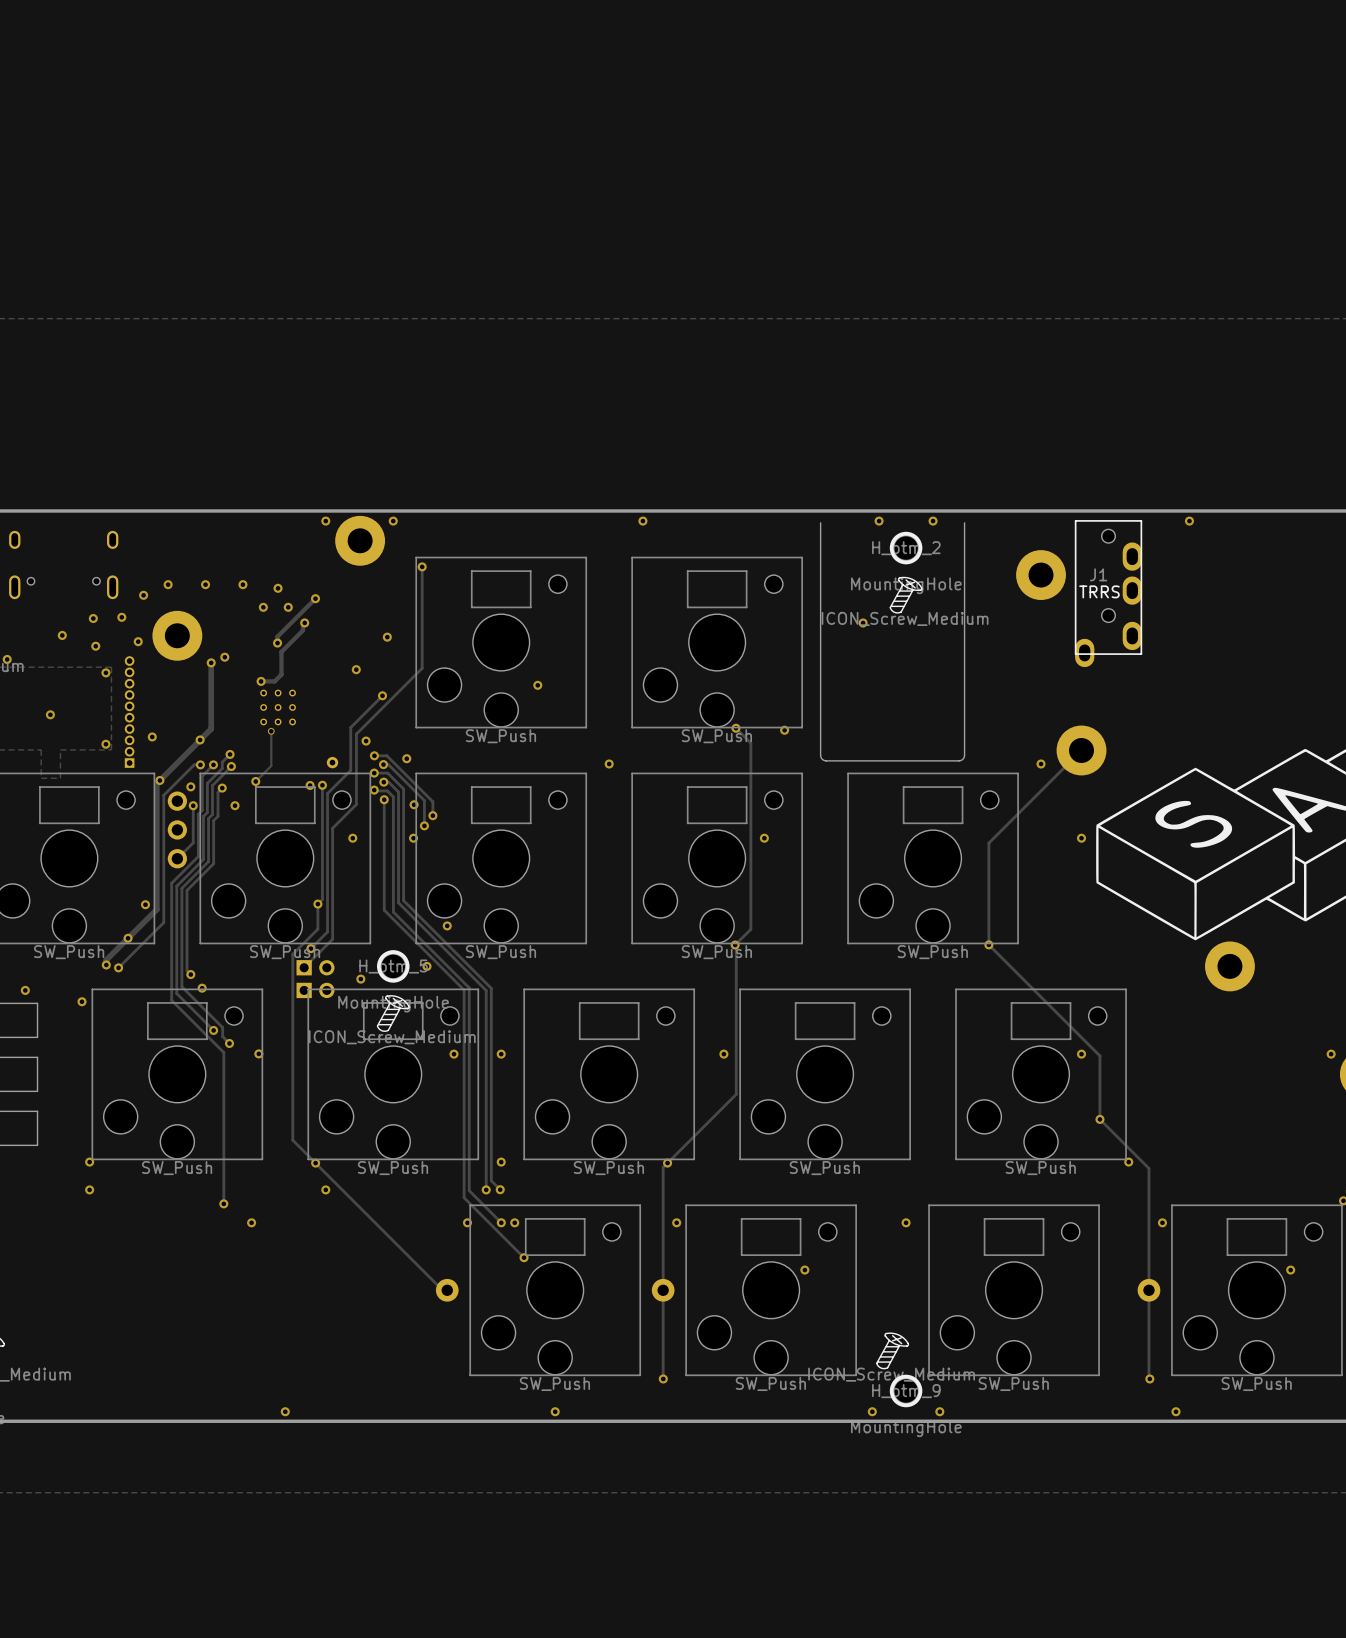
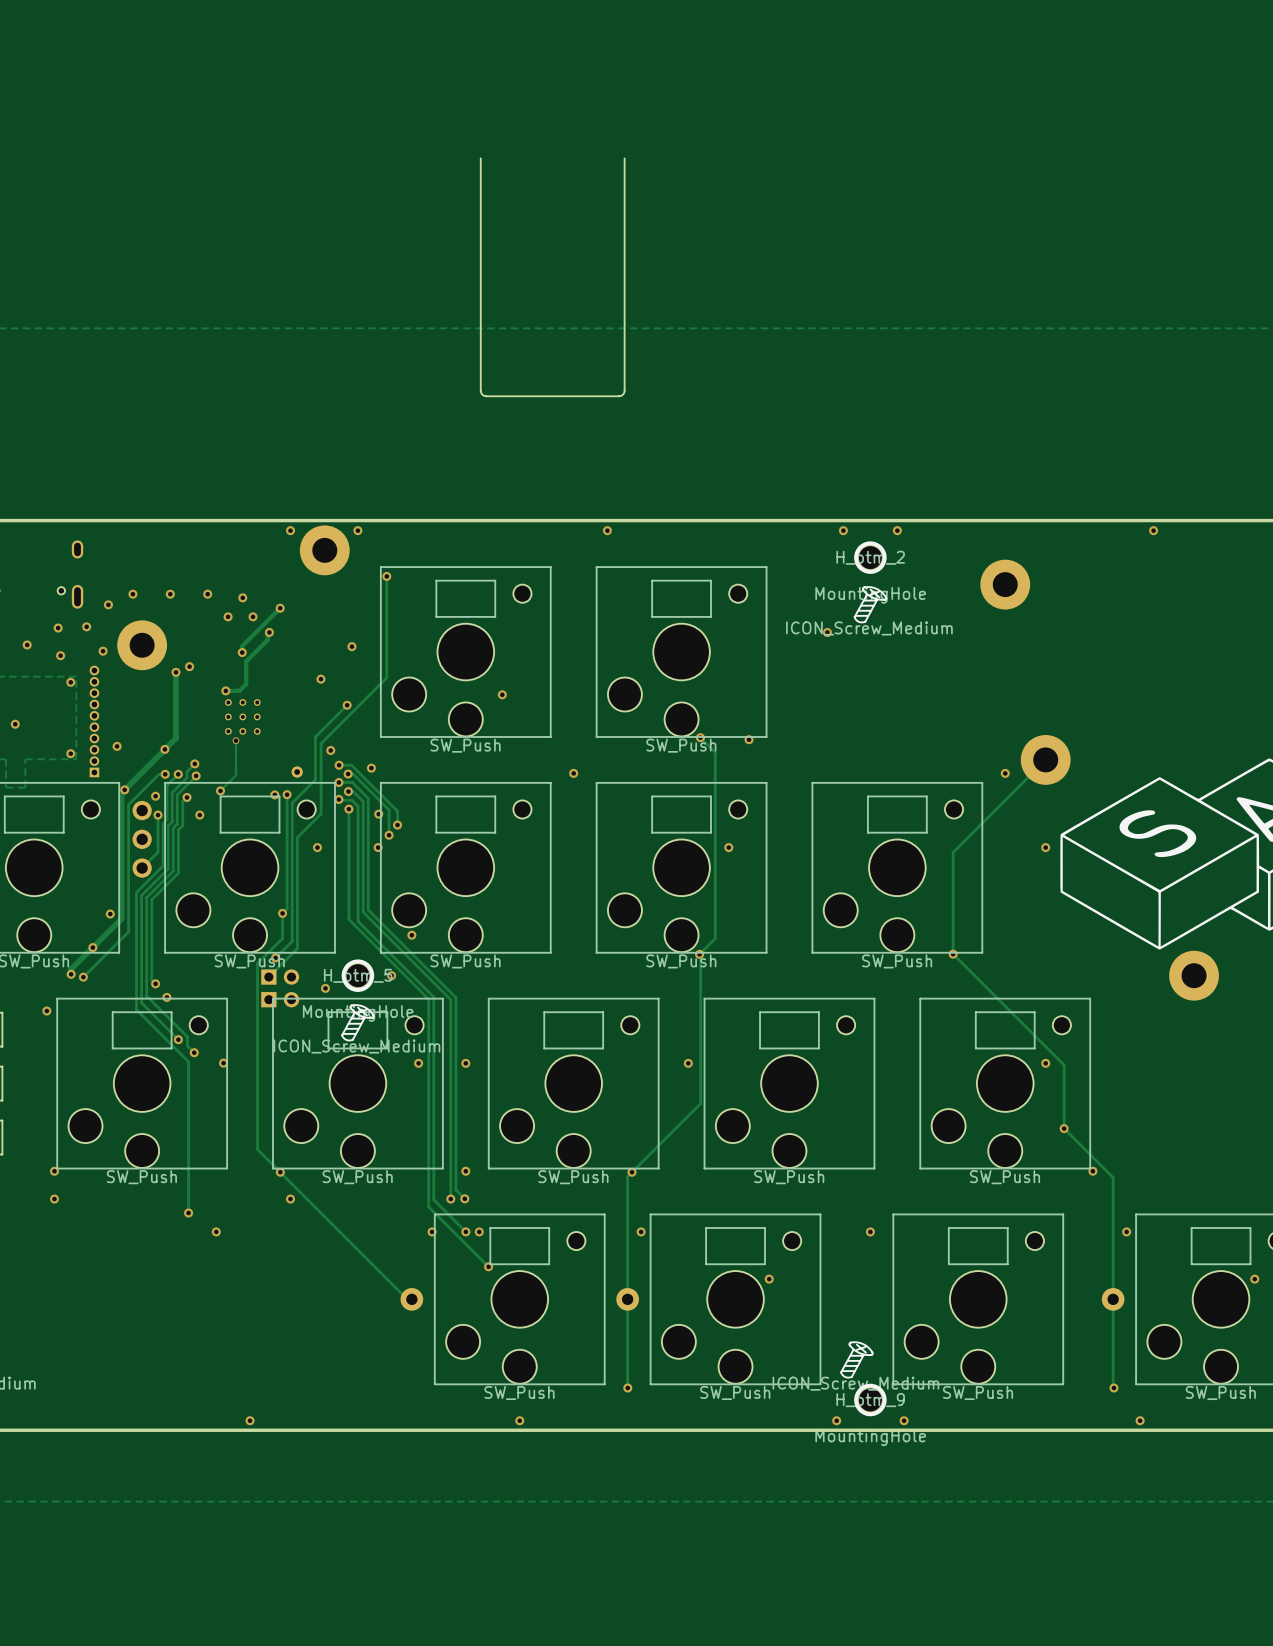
part: none -> (552, 277)
J1: (1108, 593) -> none
part: (892, 641) -> none

